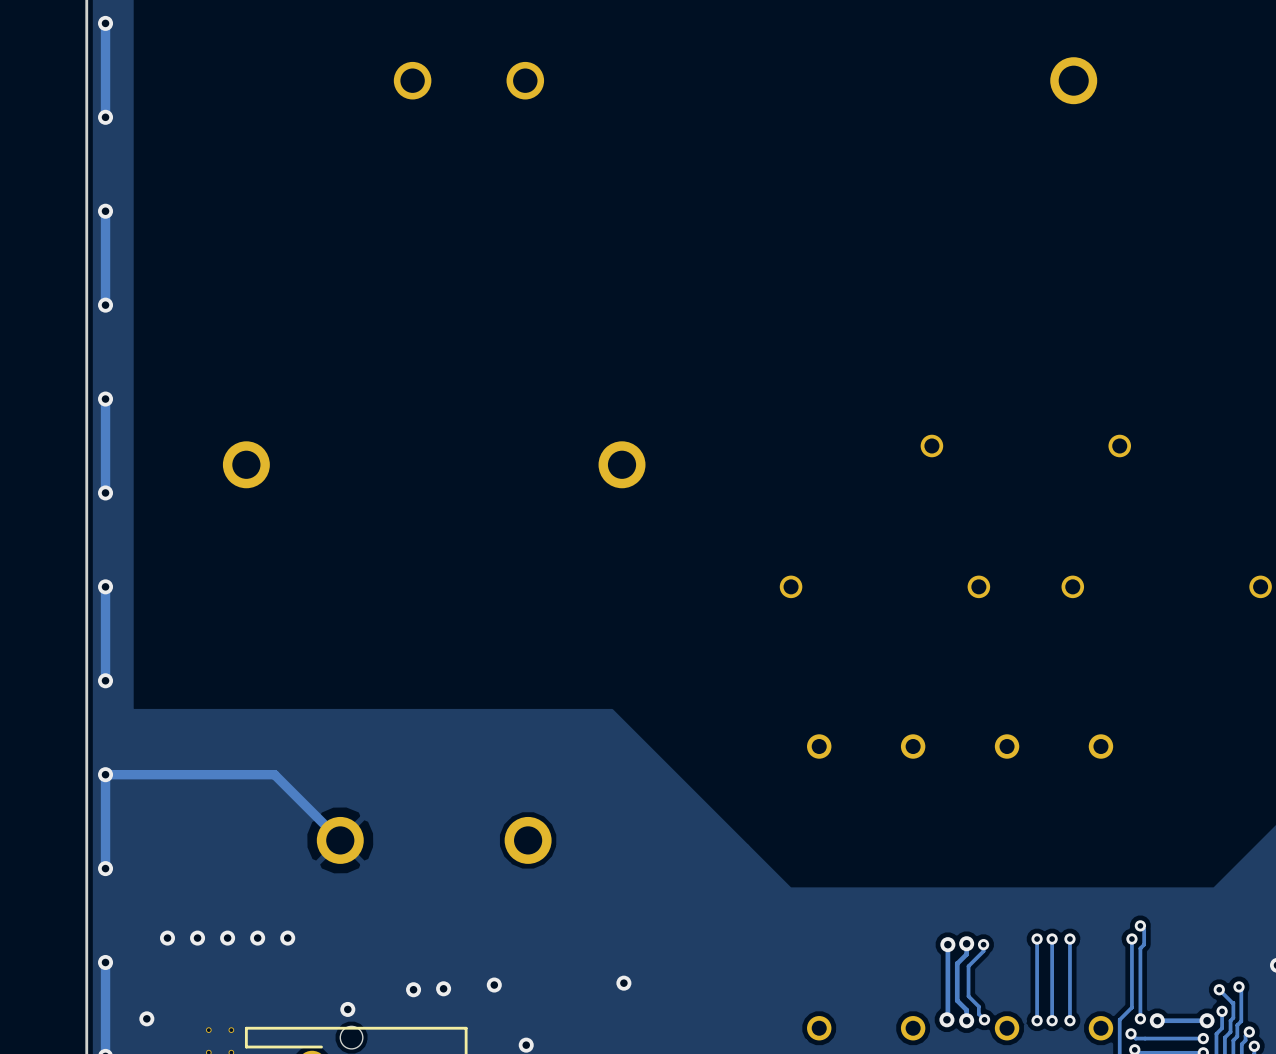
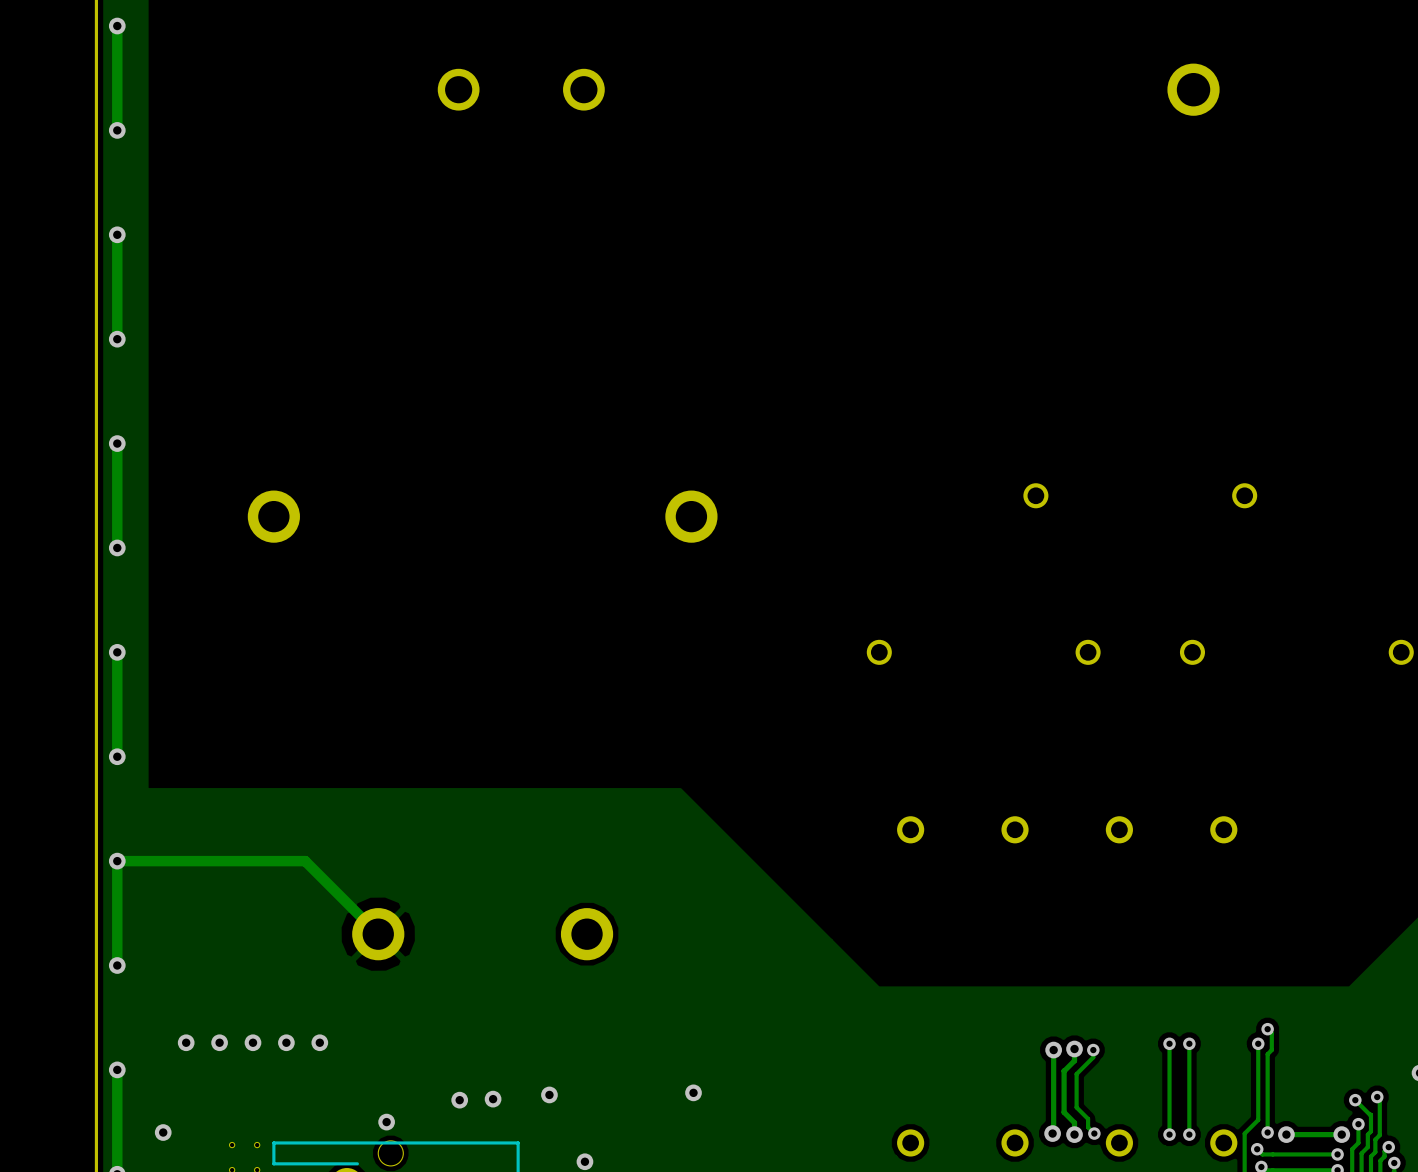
track: (1037, 939) (1037, 1020) -> none
via: (1037, 939) -> none
via: (1037, 1020) -> none

